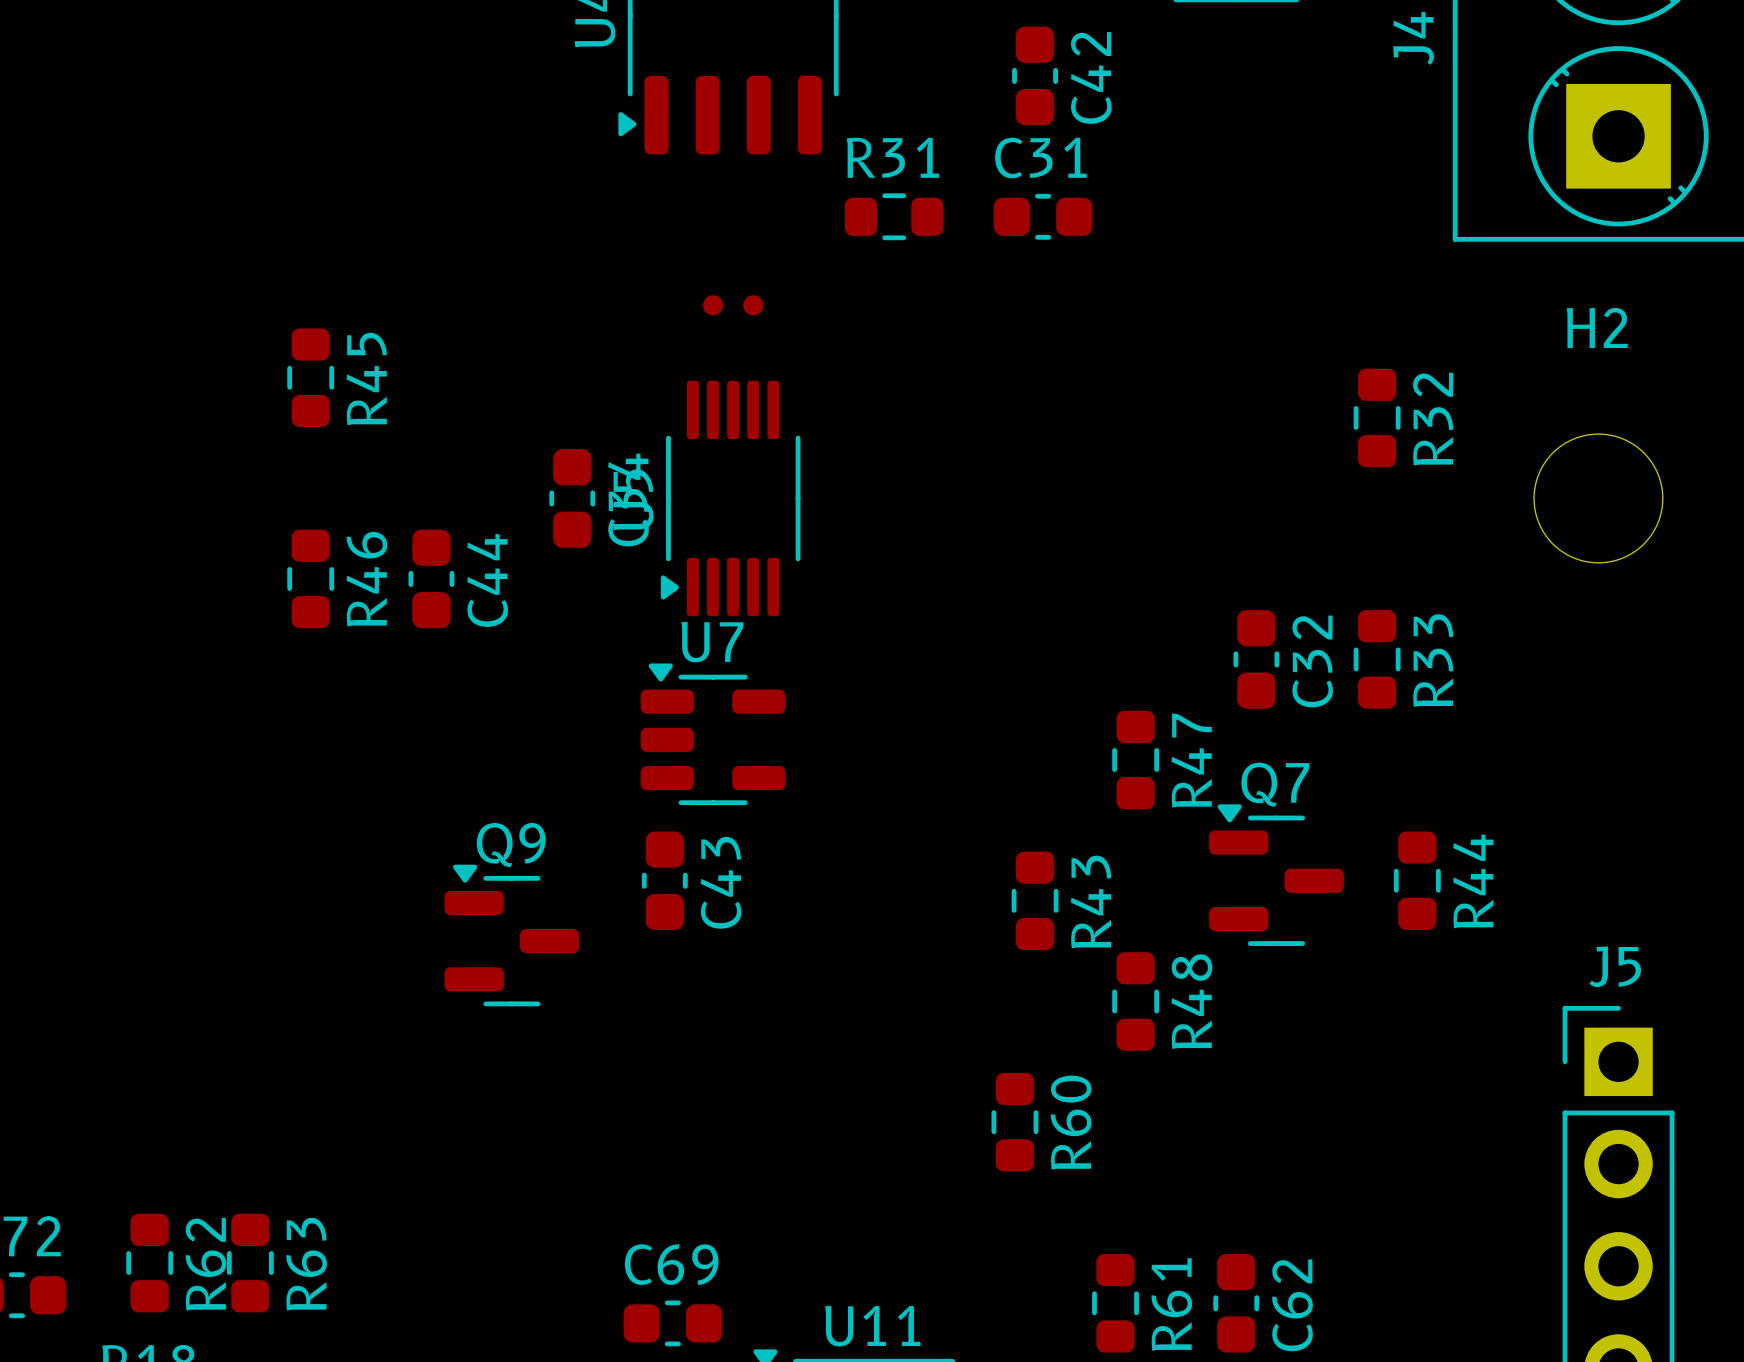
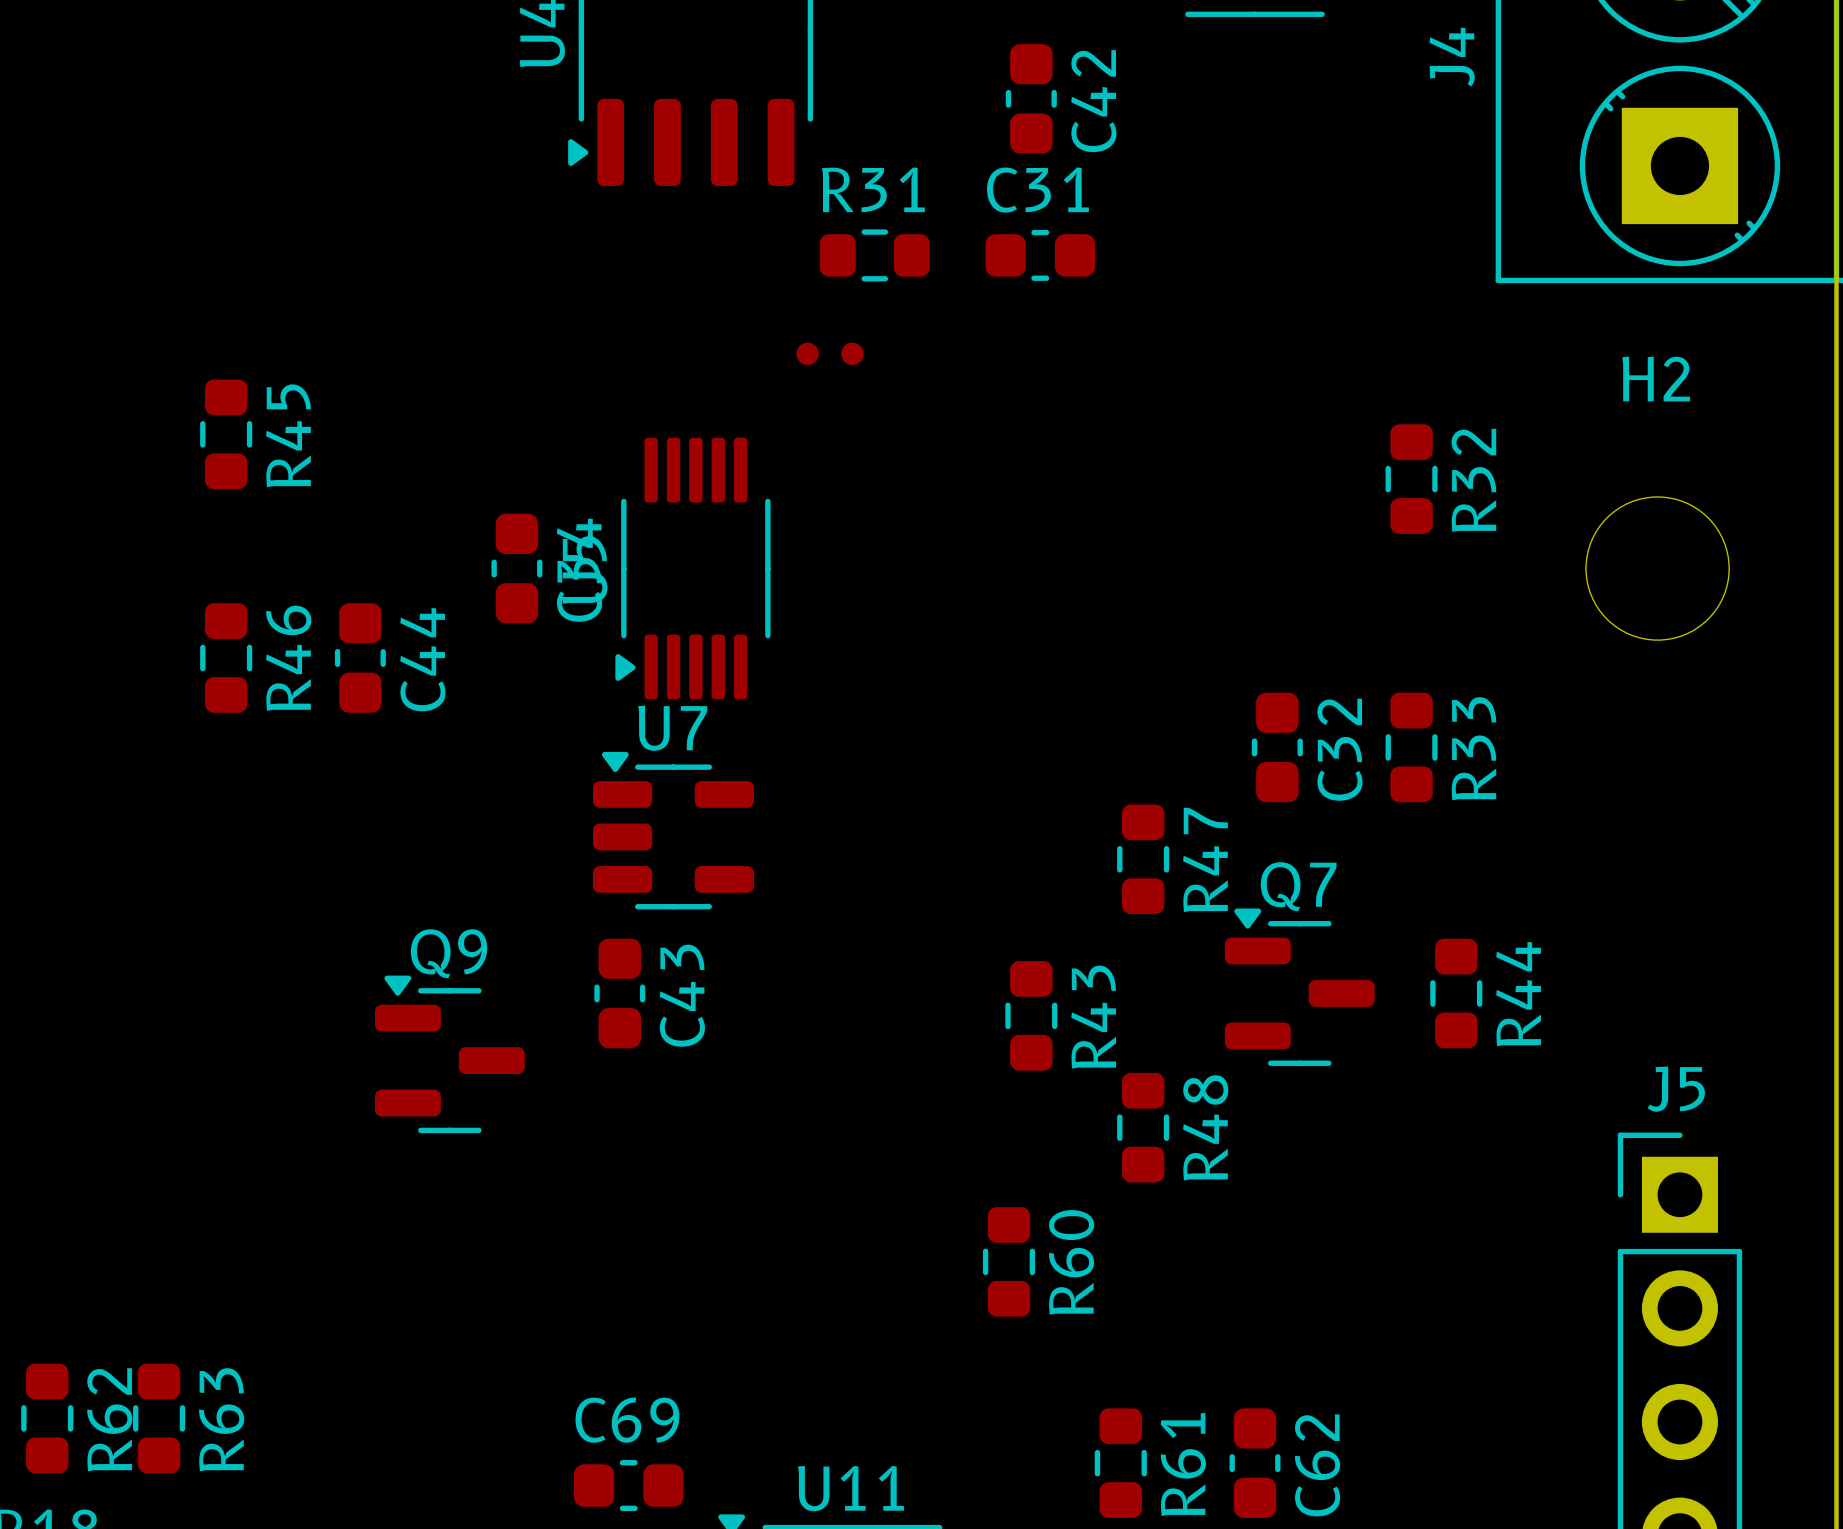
part position: (733, 305) -> (830, 353)

